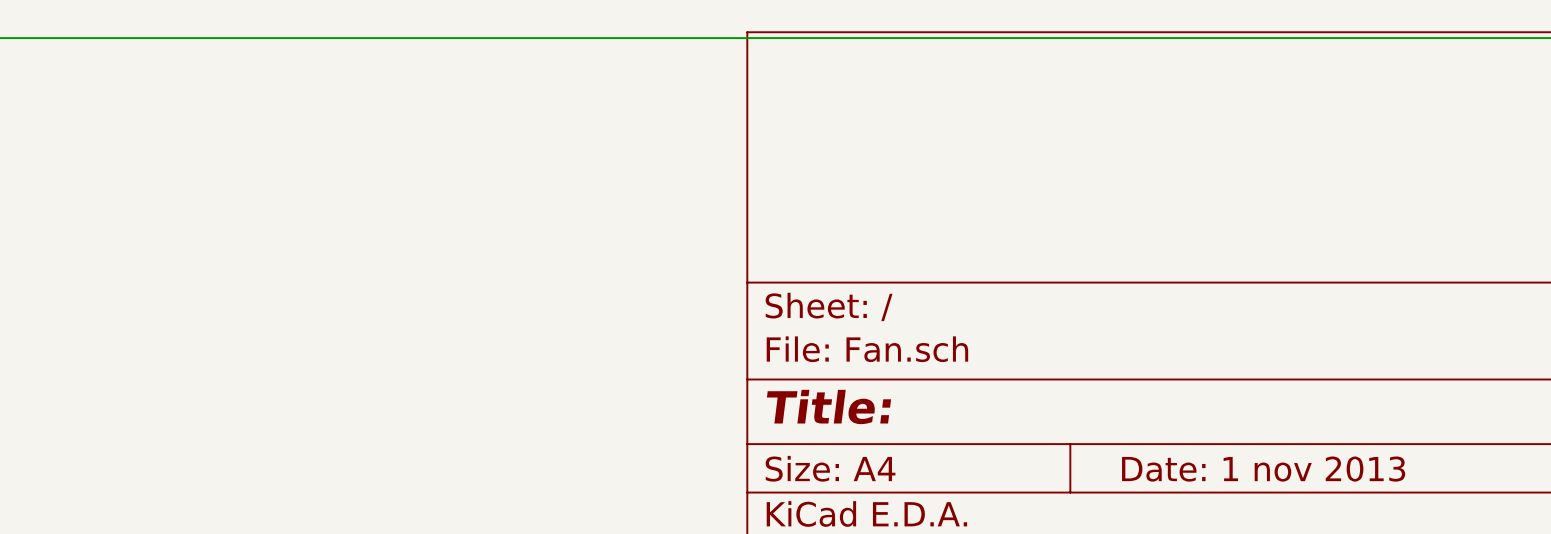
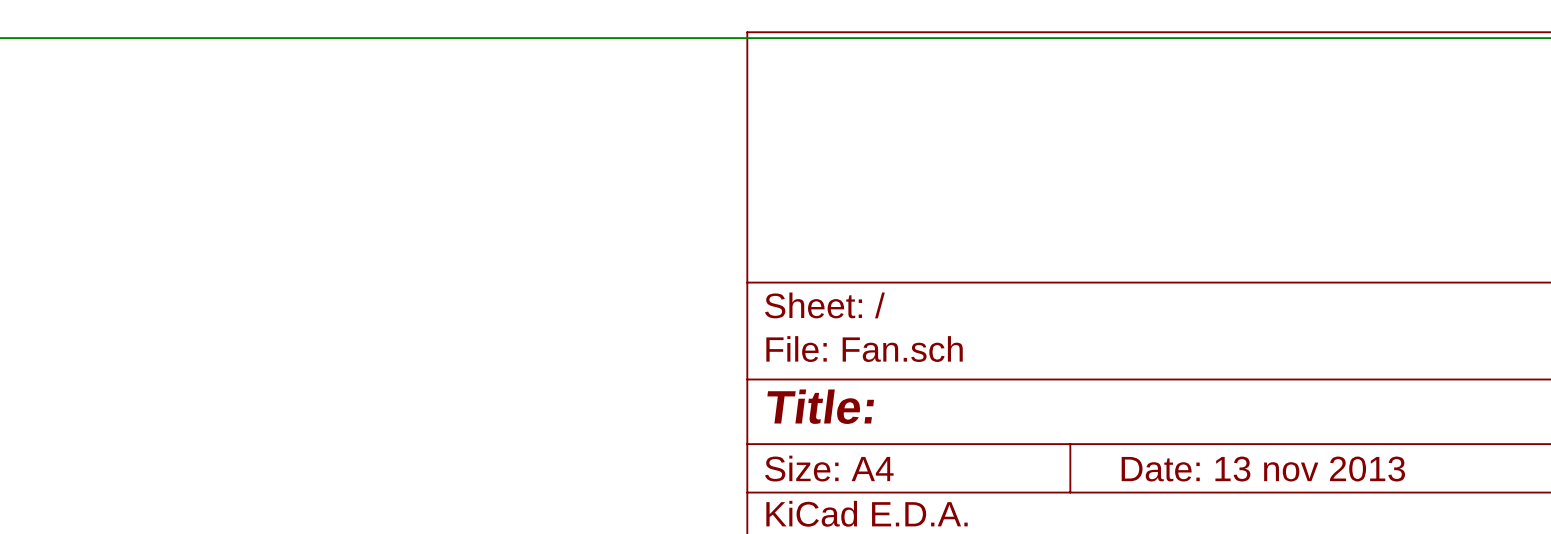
title block: Date: 1 nov 2013 (1263, 469) -> Date: 13 nov 2013 (1263, 469)

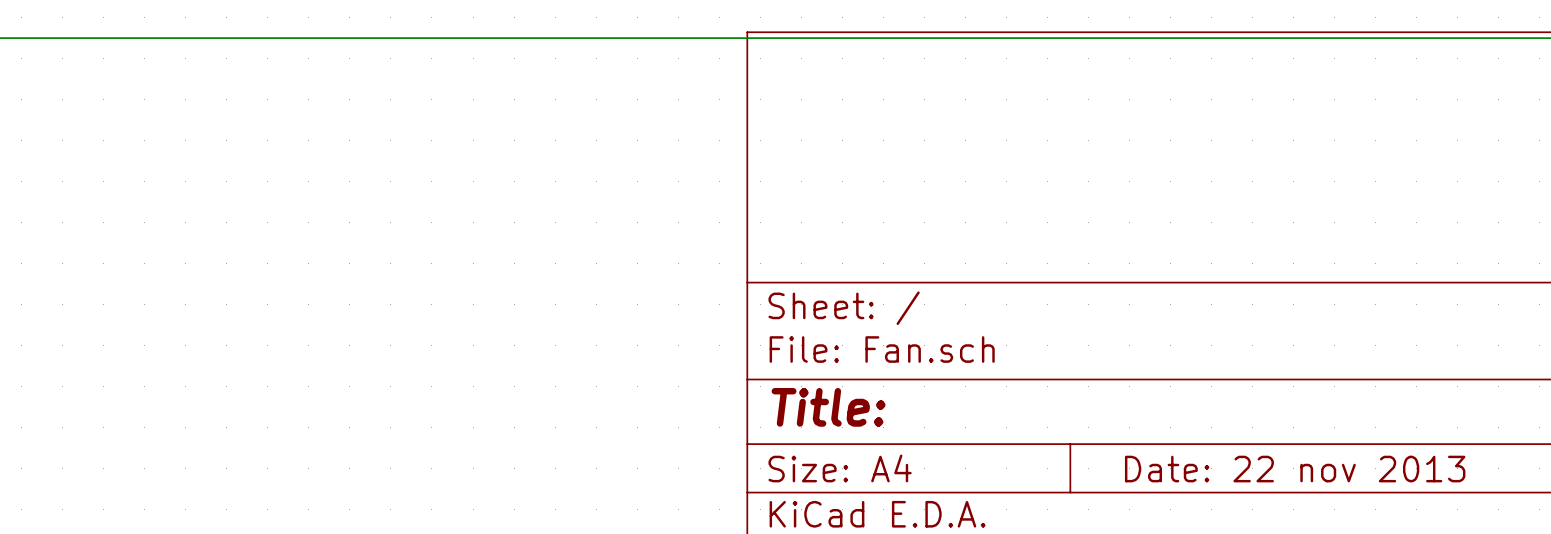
title block: Date: 13 nov 2013 (1263, 469) -> Date: 22 nov 2013 (1295, 469)

